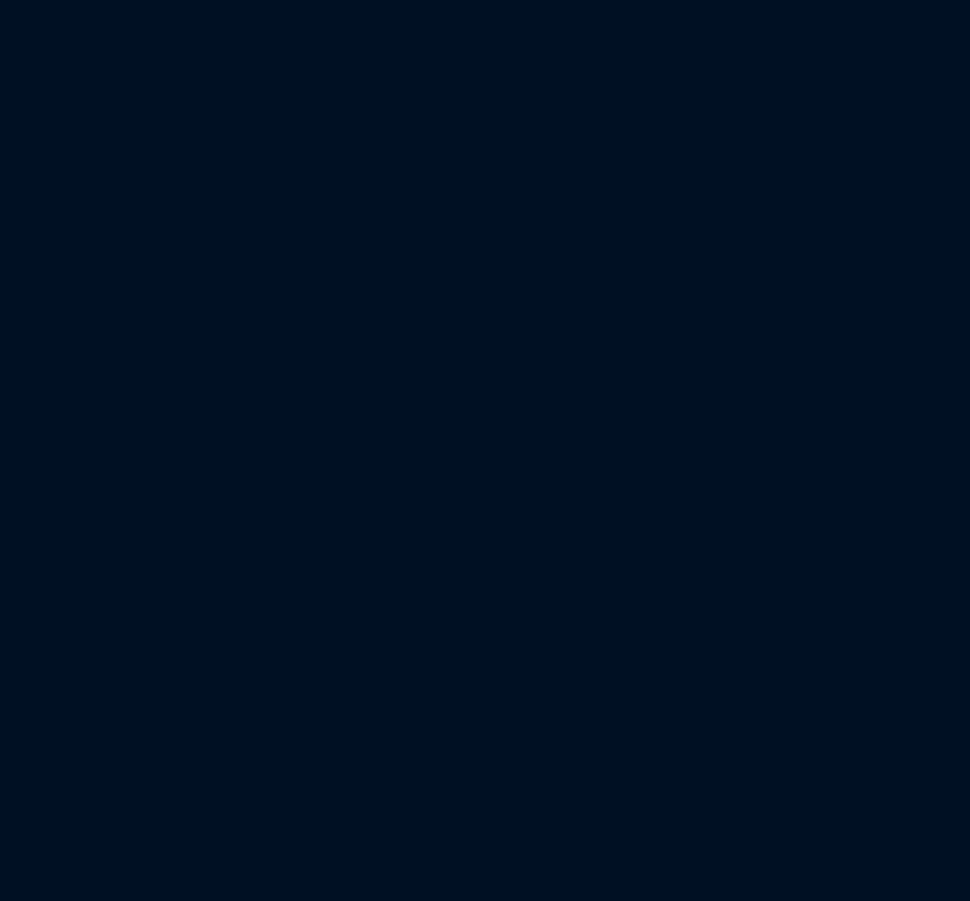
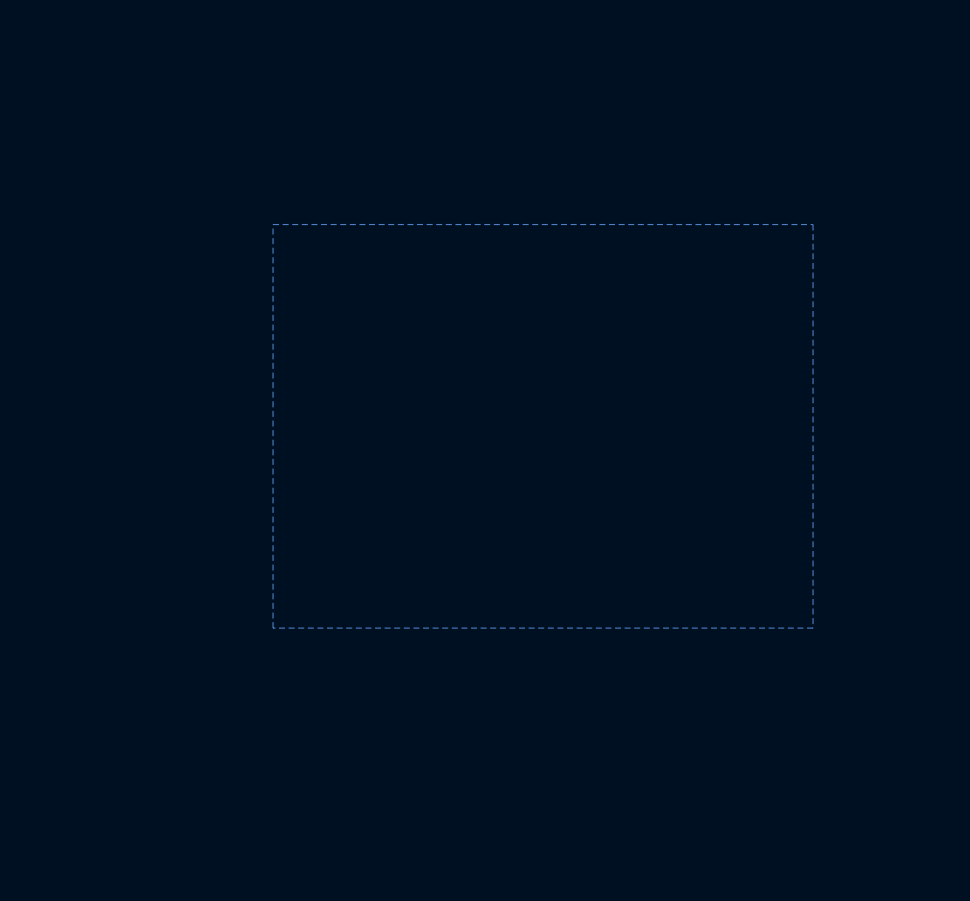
bottom zone outline: none -> (273, 224) (273, 628) (813, 628) (813, 224) (273, 224)

